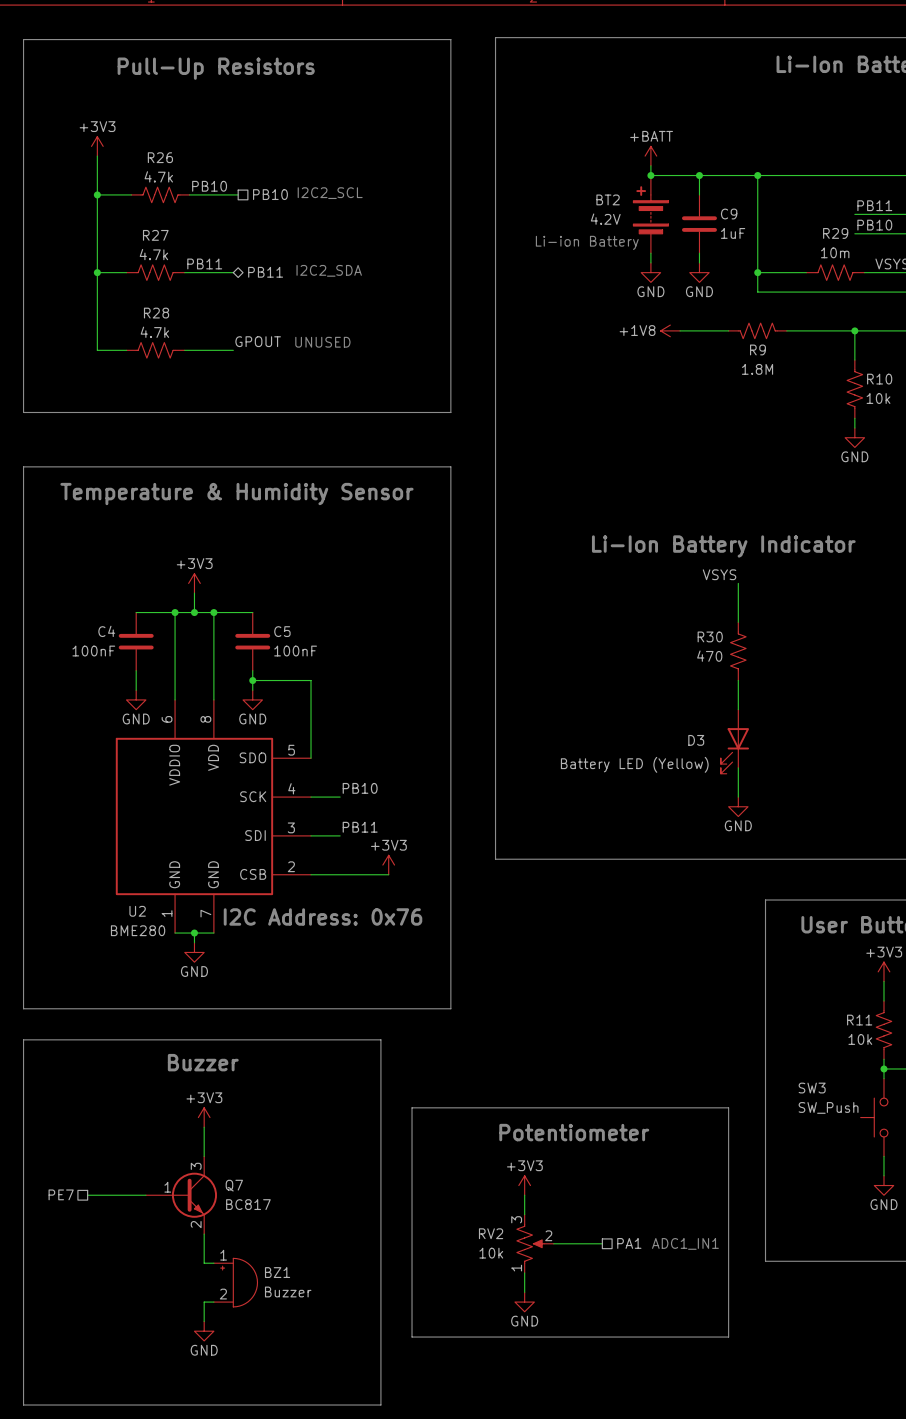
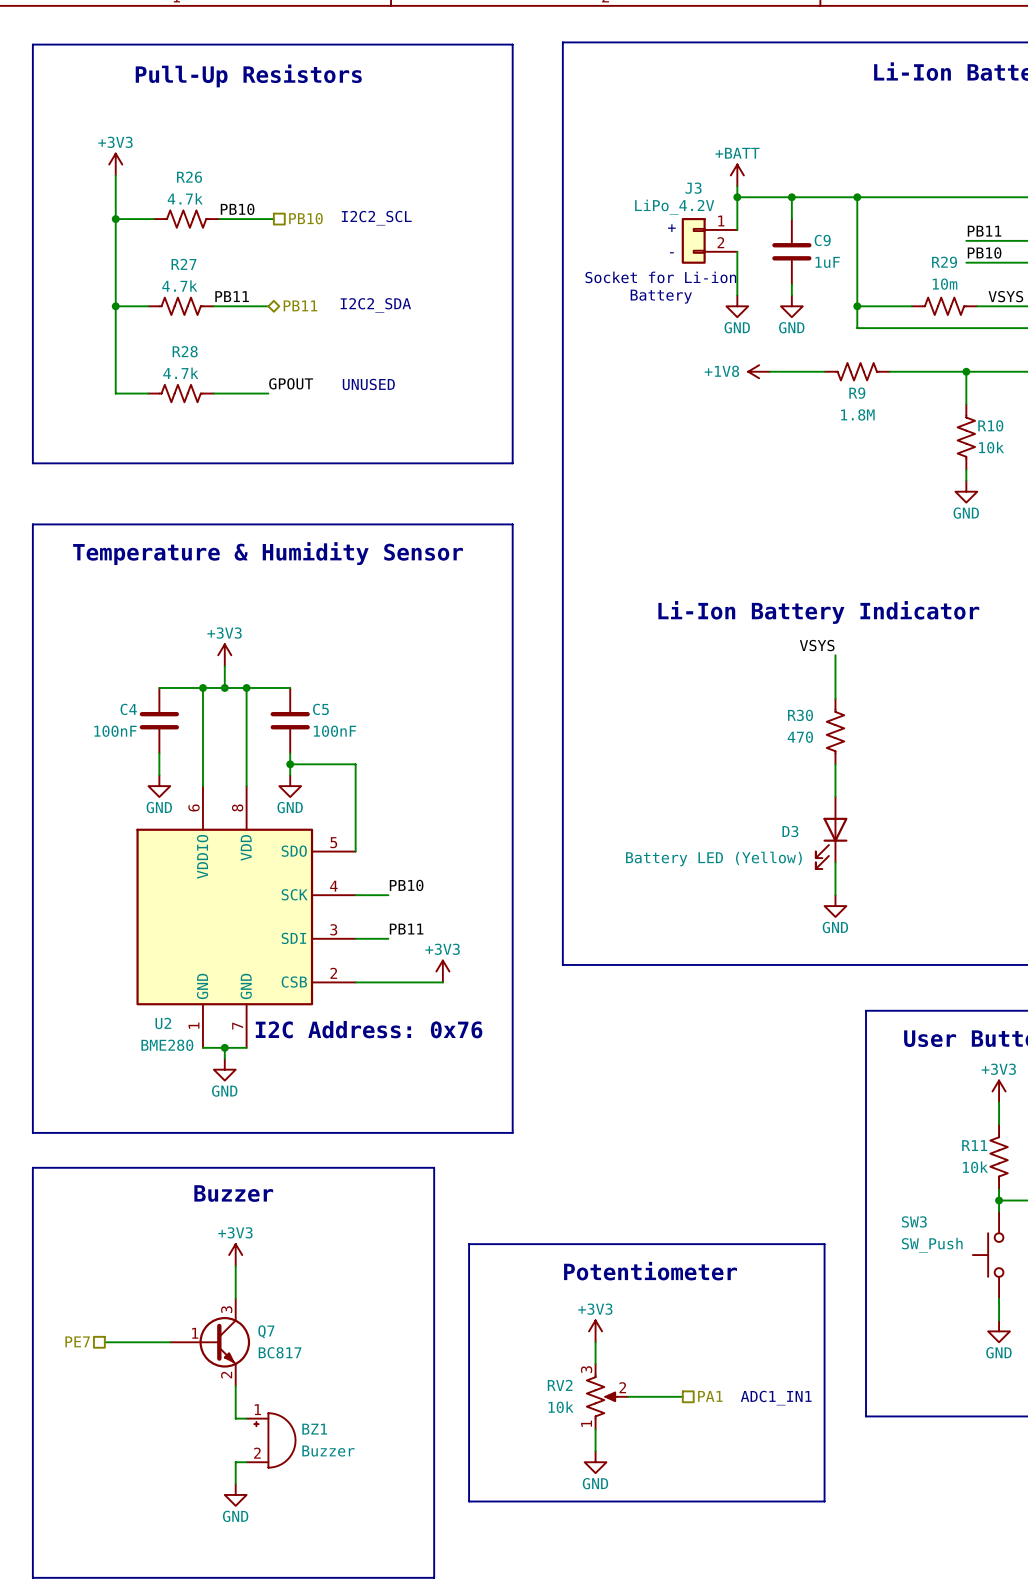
text: none -> + (671, 228)
J3: none -> LiPo_4.2V (709, 240)
BT2: 4.2V (650, 214) -> none
text: none -> - (671, 252)
text: Li-ion Battery (587, 242) -> Socket for Li-ion (660, 277)
text: none -> Battery (661, 296)

